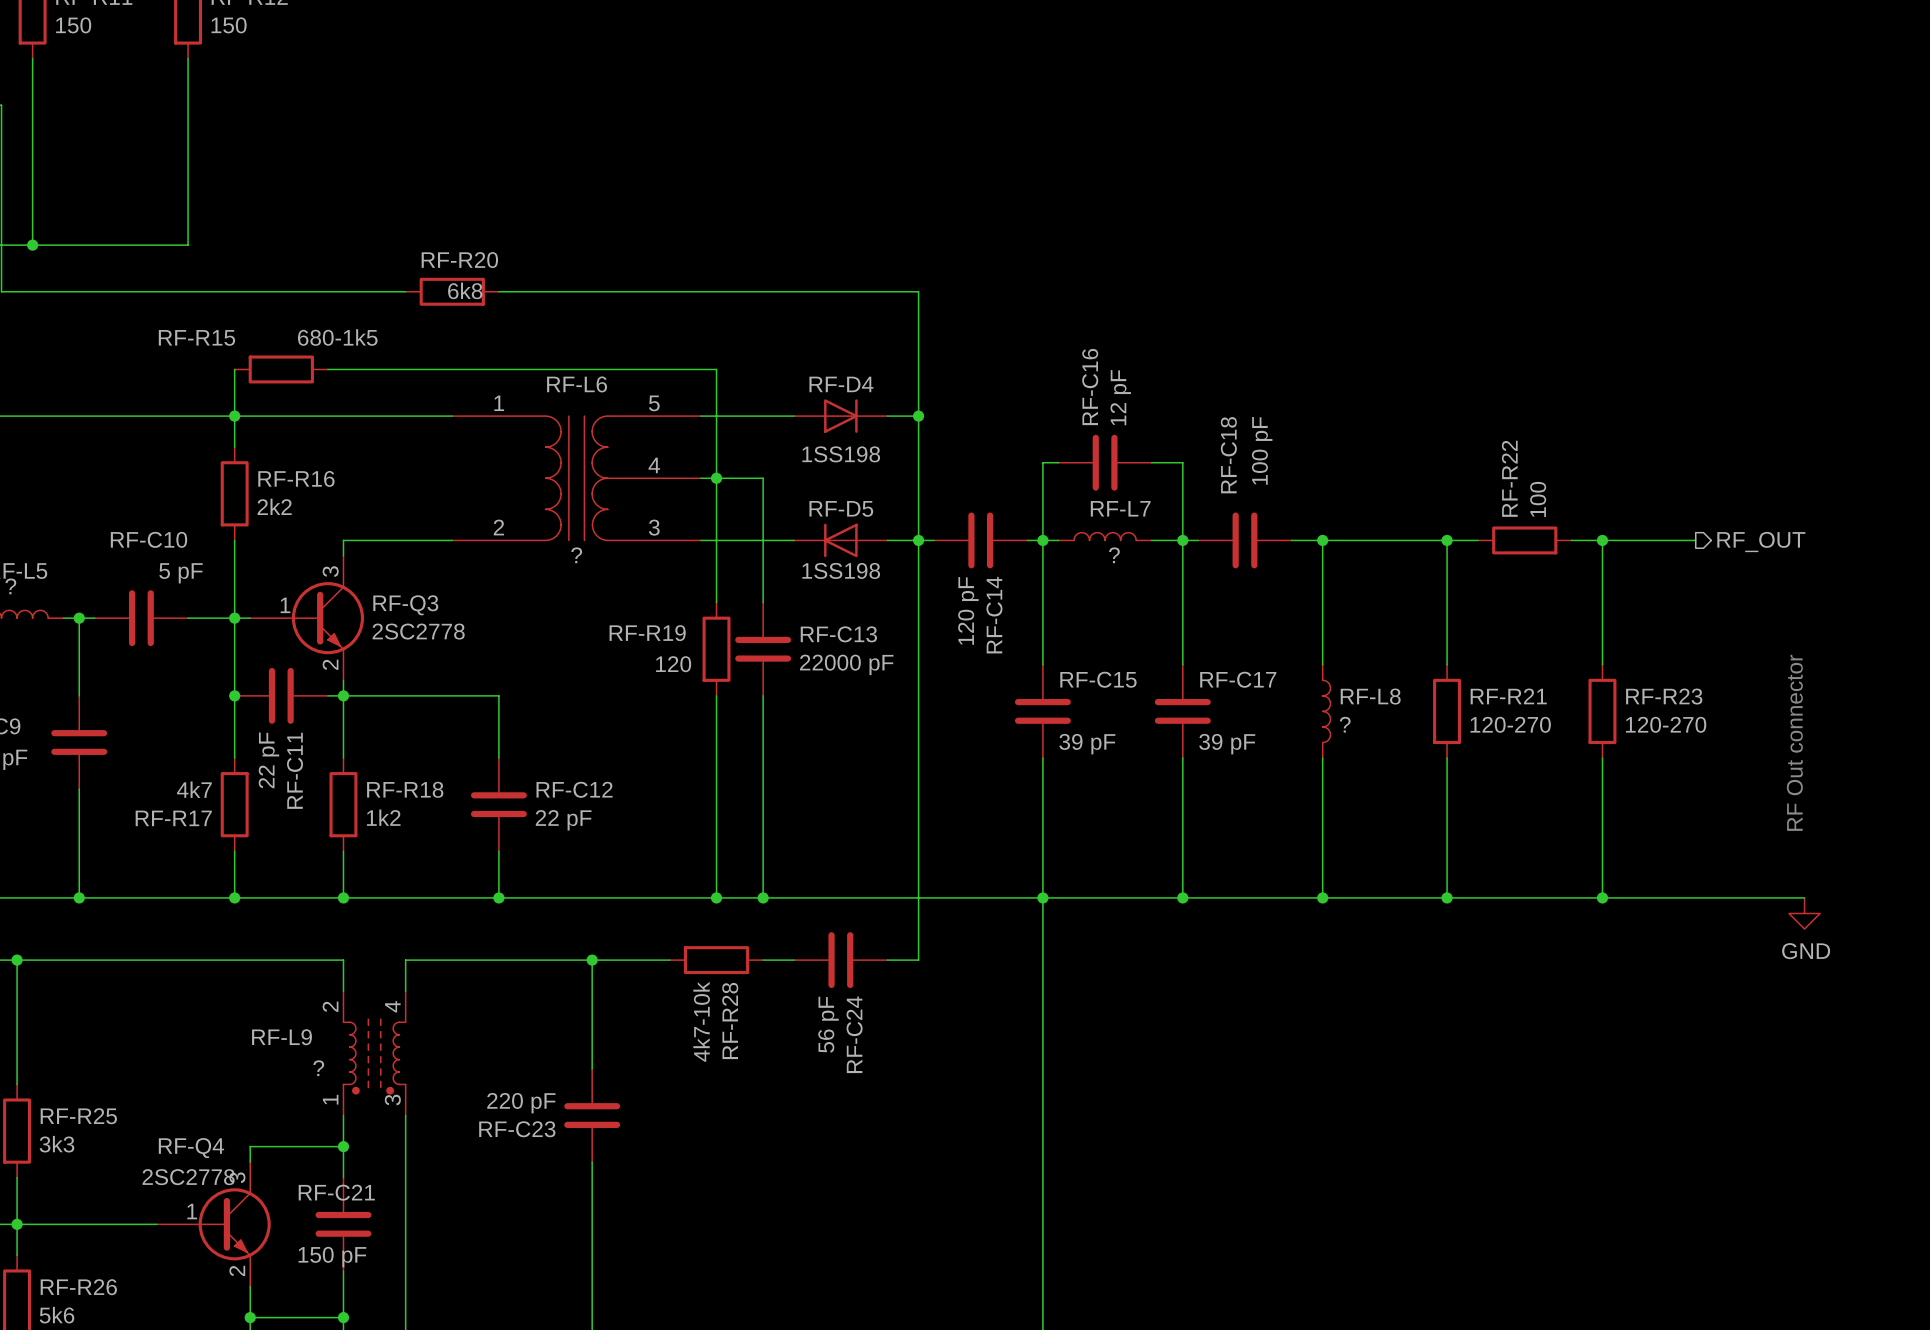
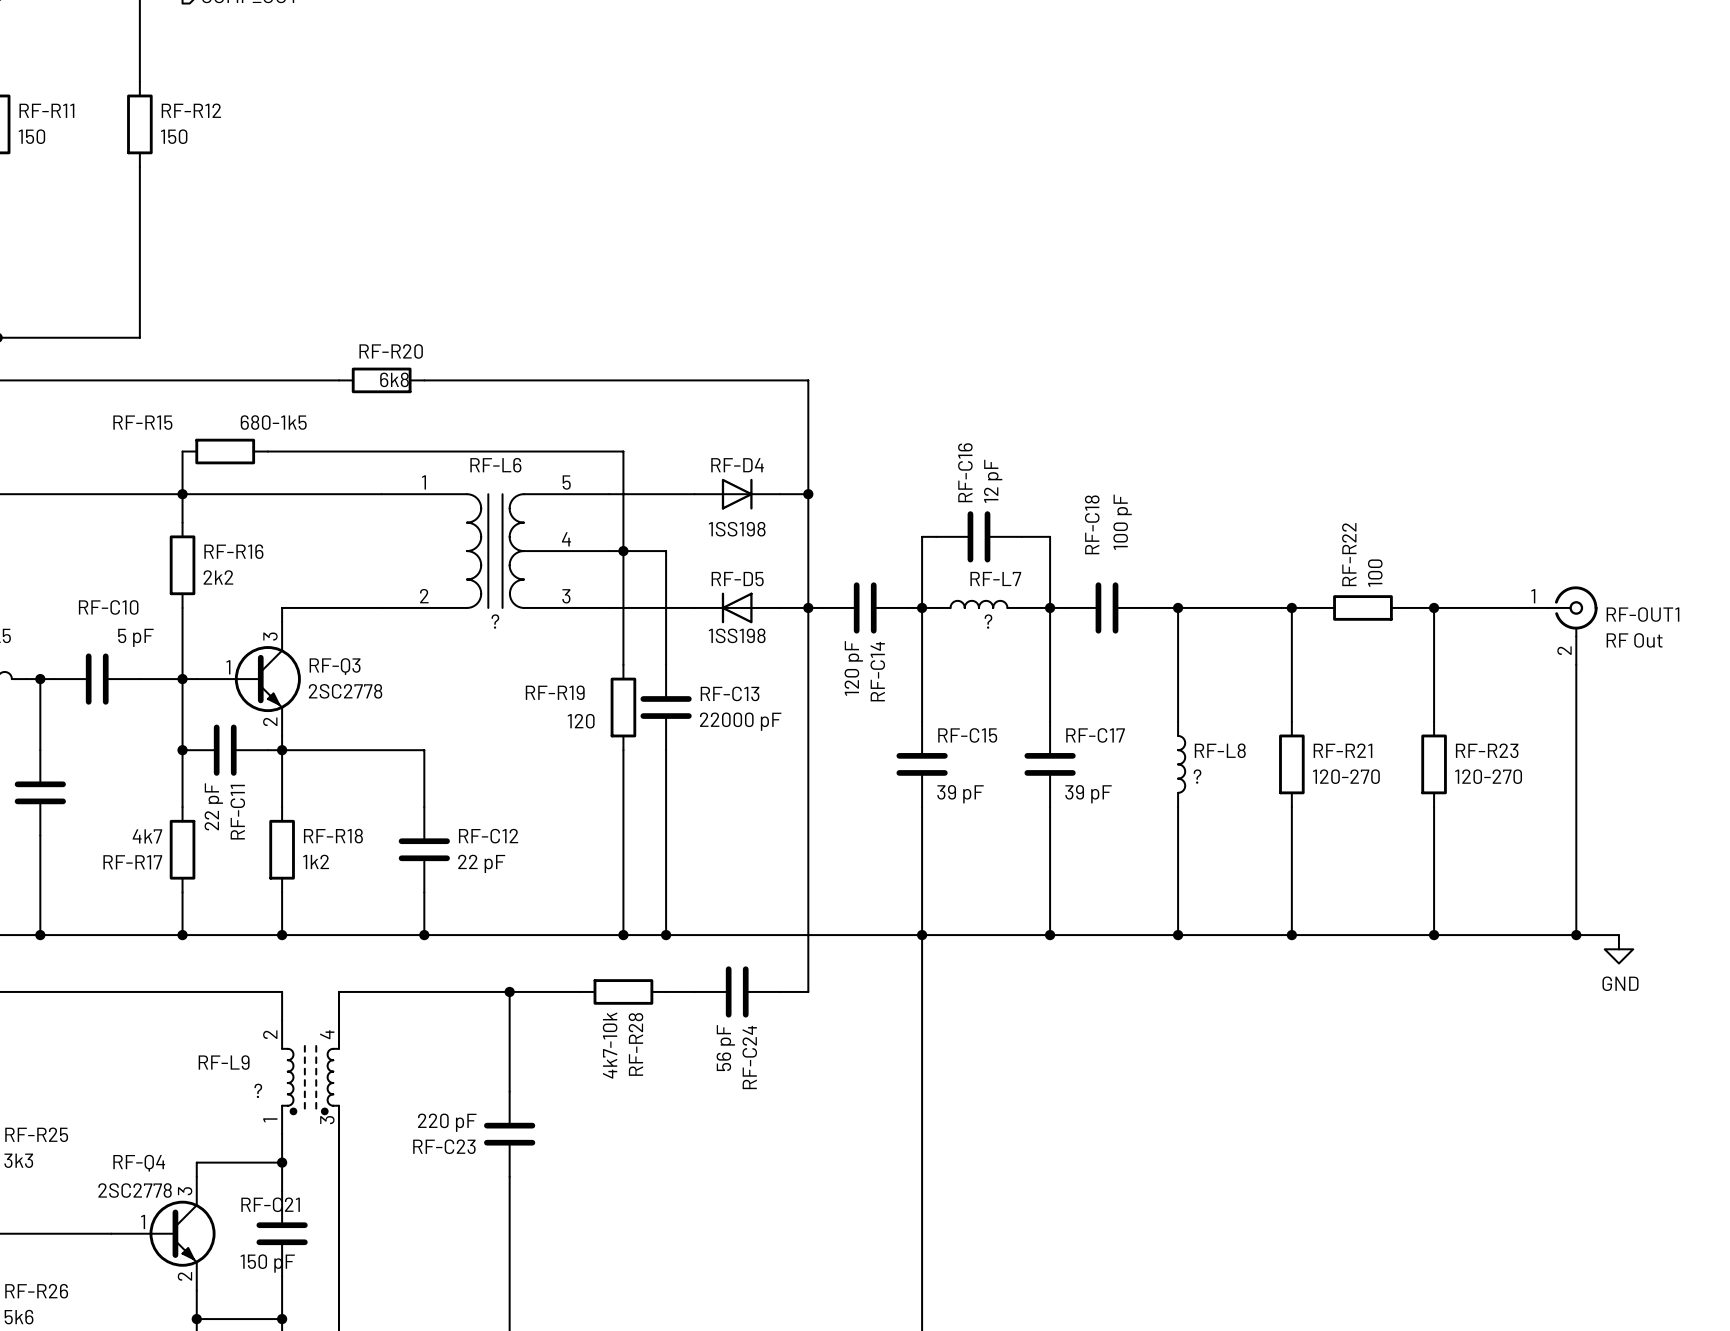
hierarchical label: RF_OUT (1761, 541) -> none
RF-OUT1: none -> RF Out (1558, 625)
wire: none -> (1576, 664) (1576, 935)
text: RF Out connector (1794, 742) -> none
junction: none -> (1576, 935)

